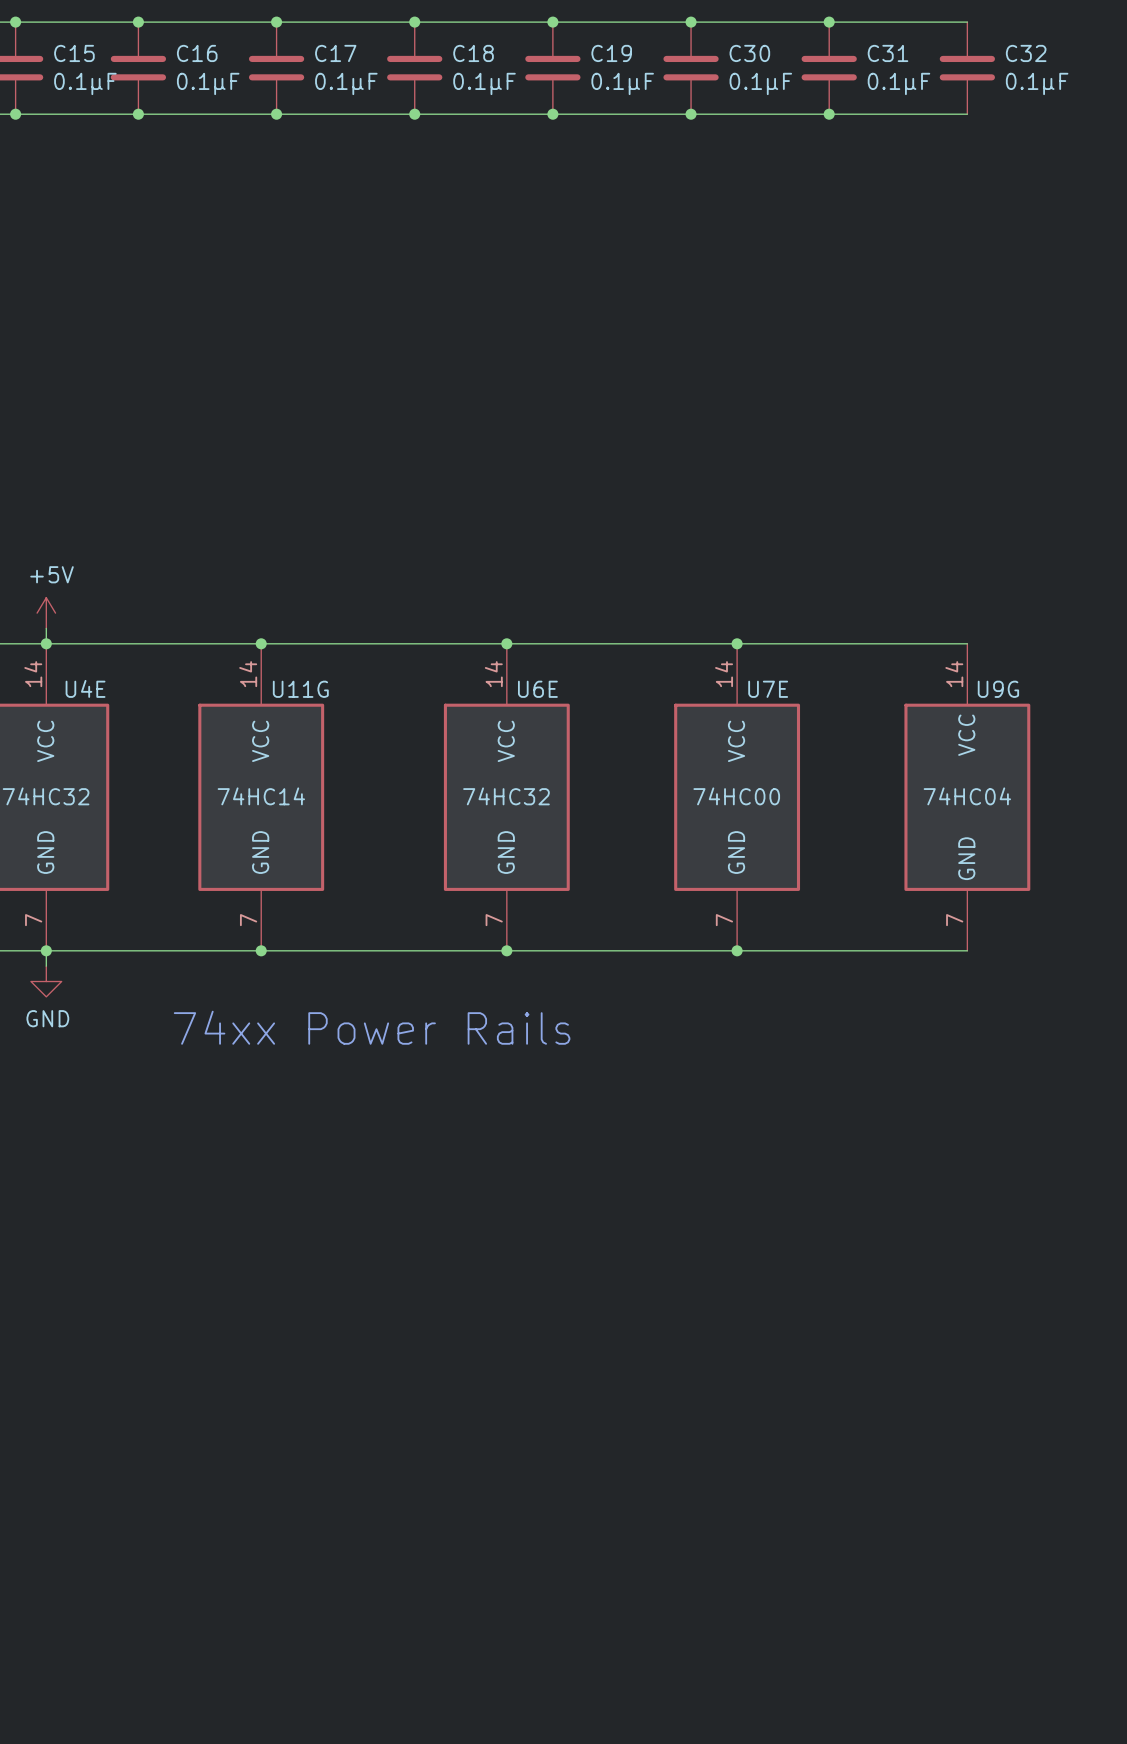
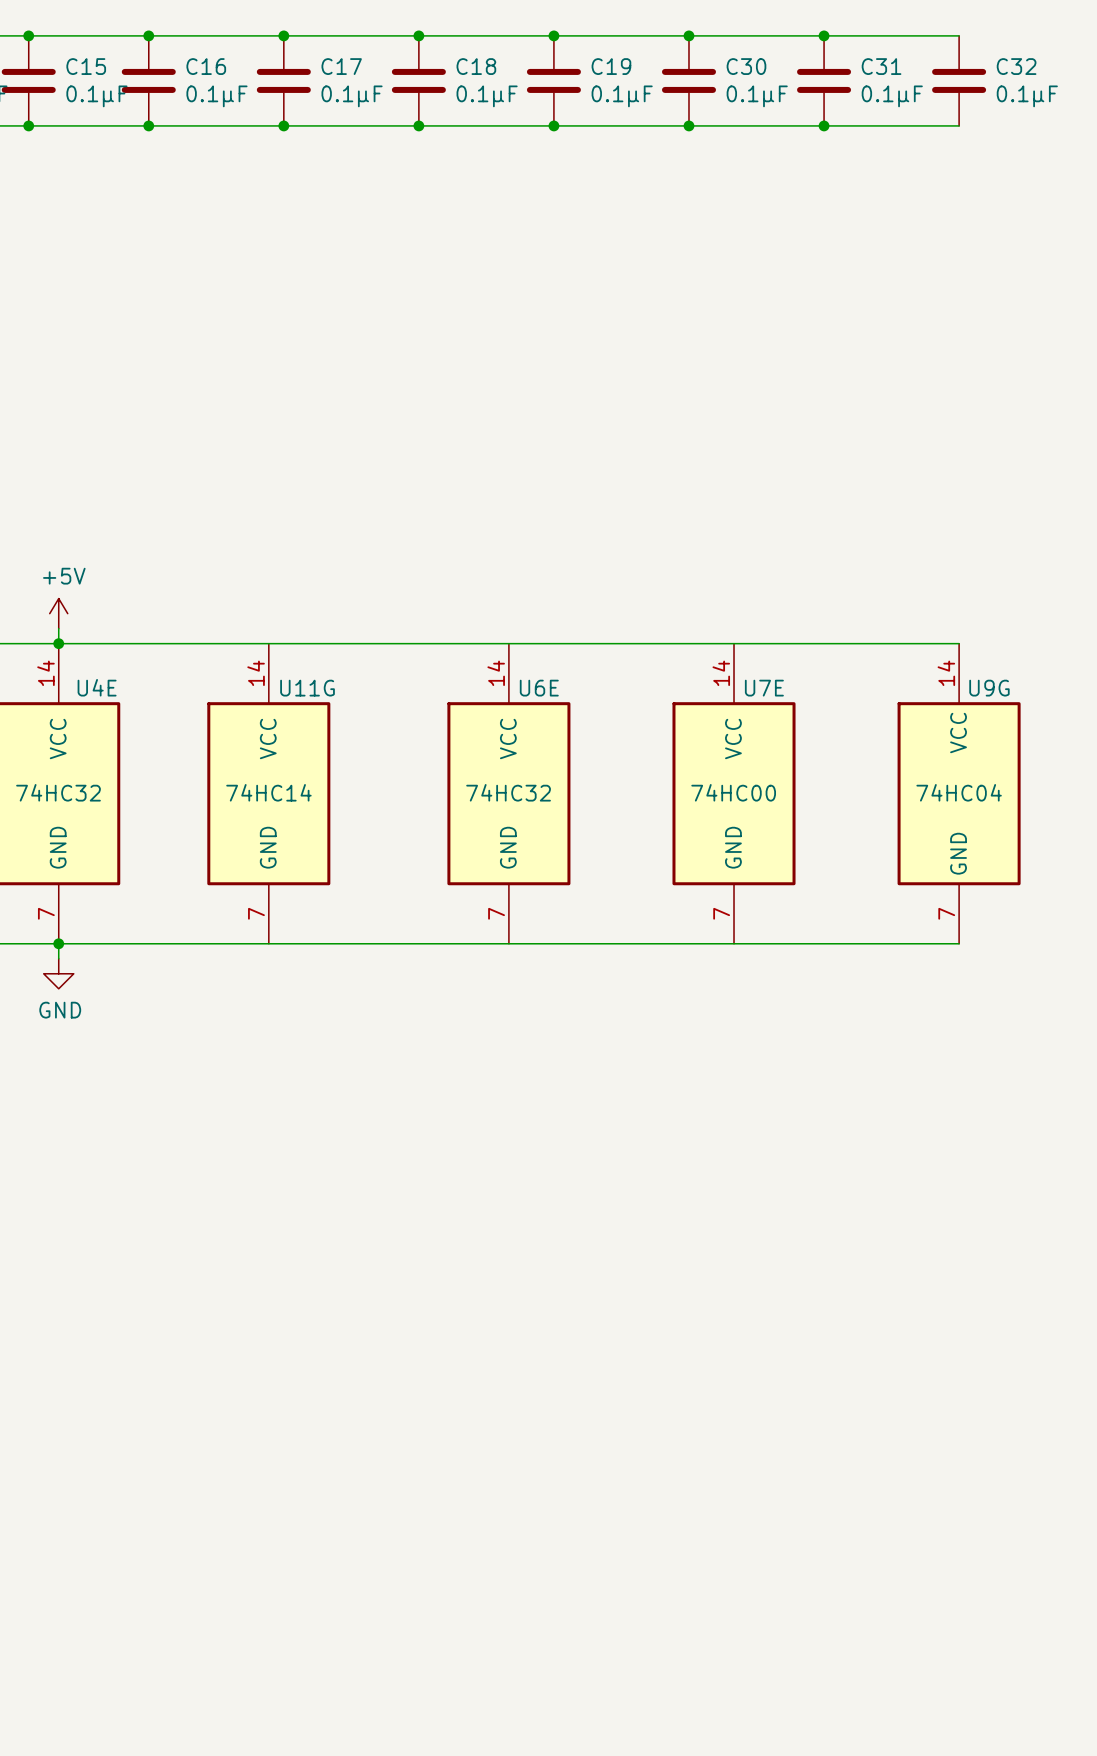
junction: (261, 643) -> none
junction: (506, 643) -> none
junction: (737, 643) -> none
junction: (261, 950) -> none
junction: (506, 950) -> none
junction: (737, 950) -> none
text: 74xx Power Rails (372, 1027) -> none

